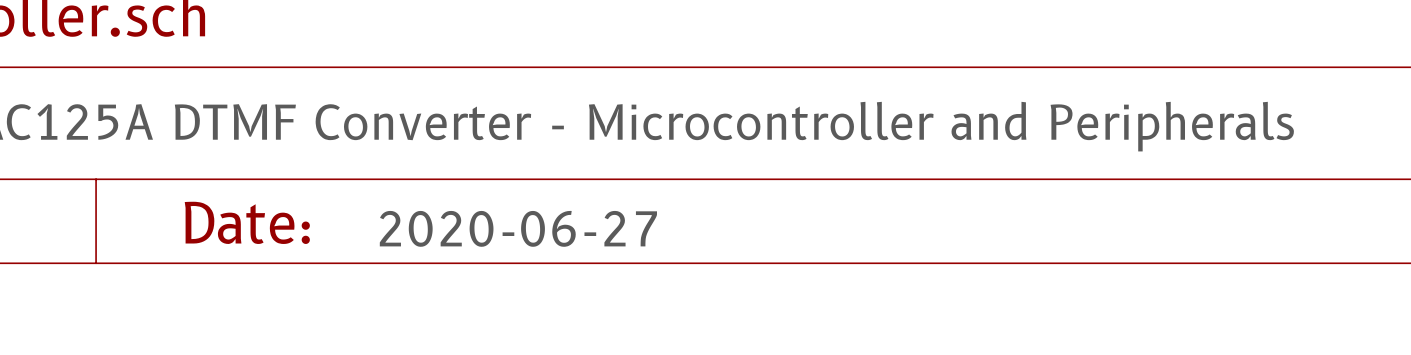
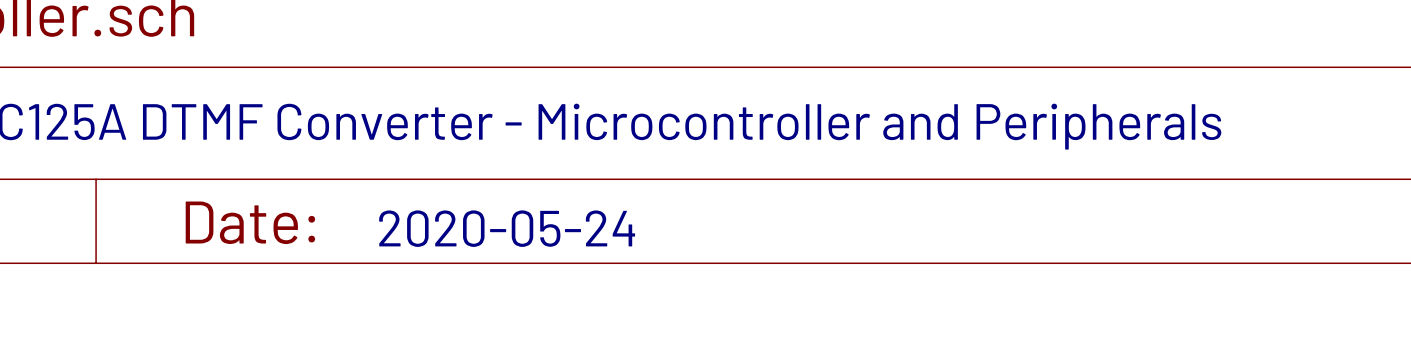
text: 2020-06-27 (518, 228) -> 2020-05-24 (507, 228)

